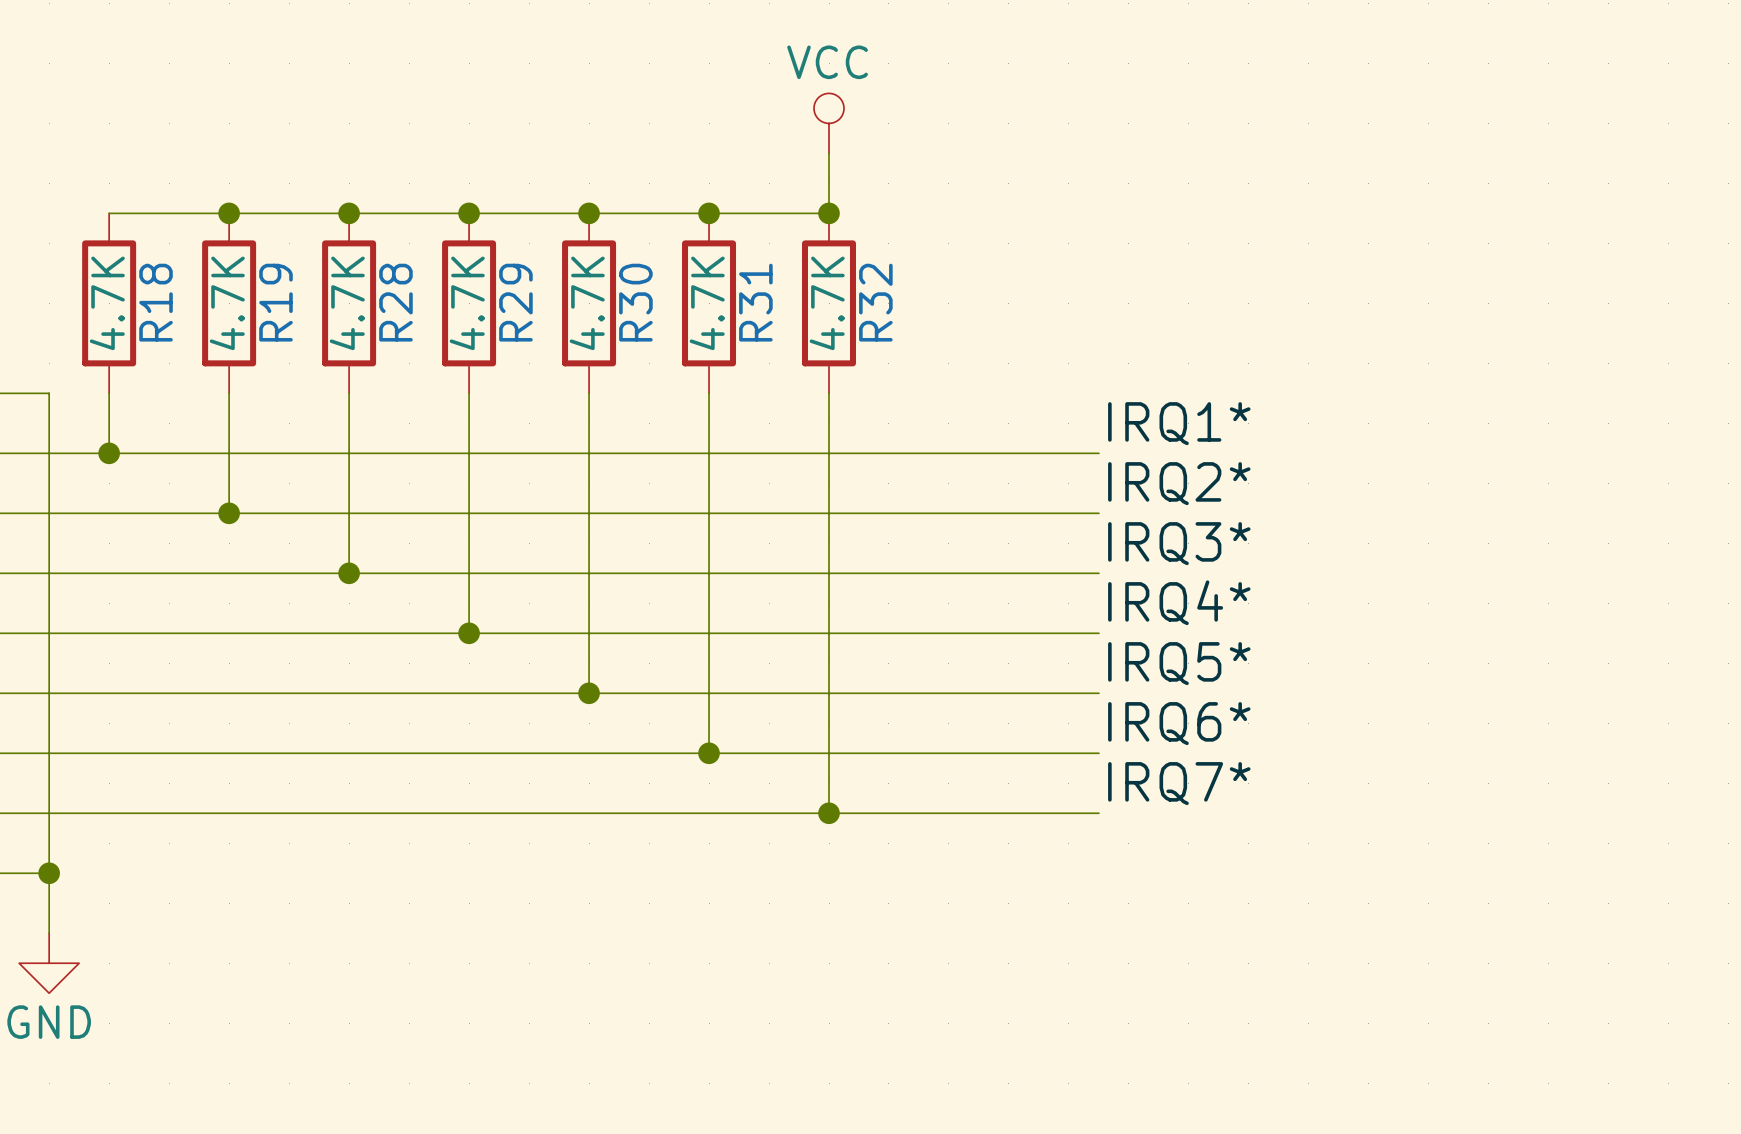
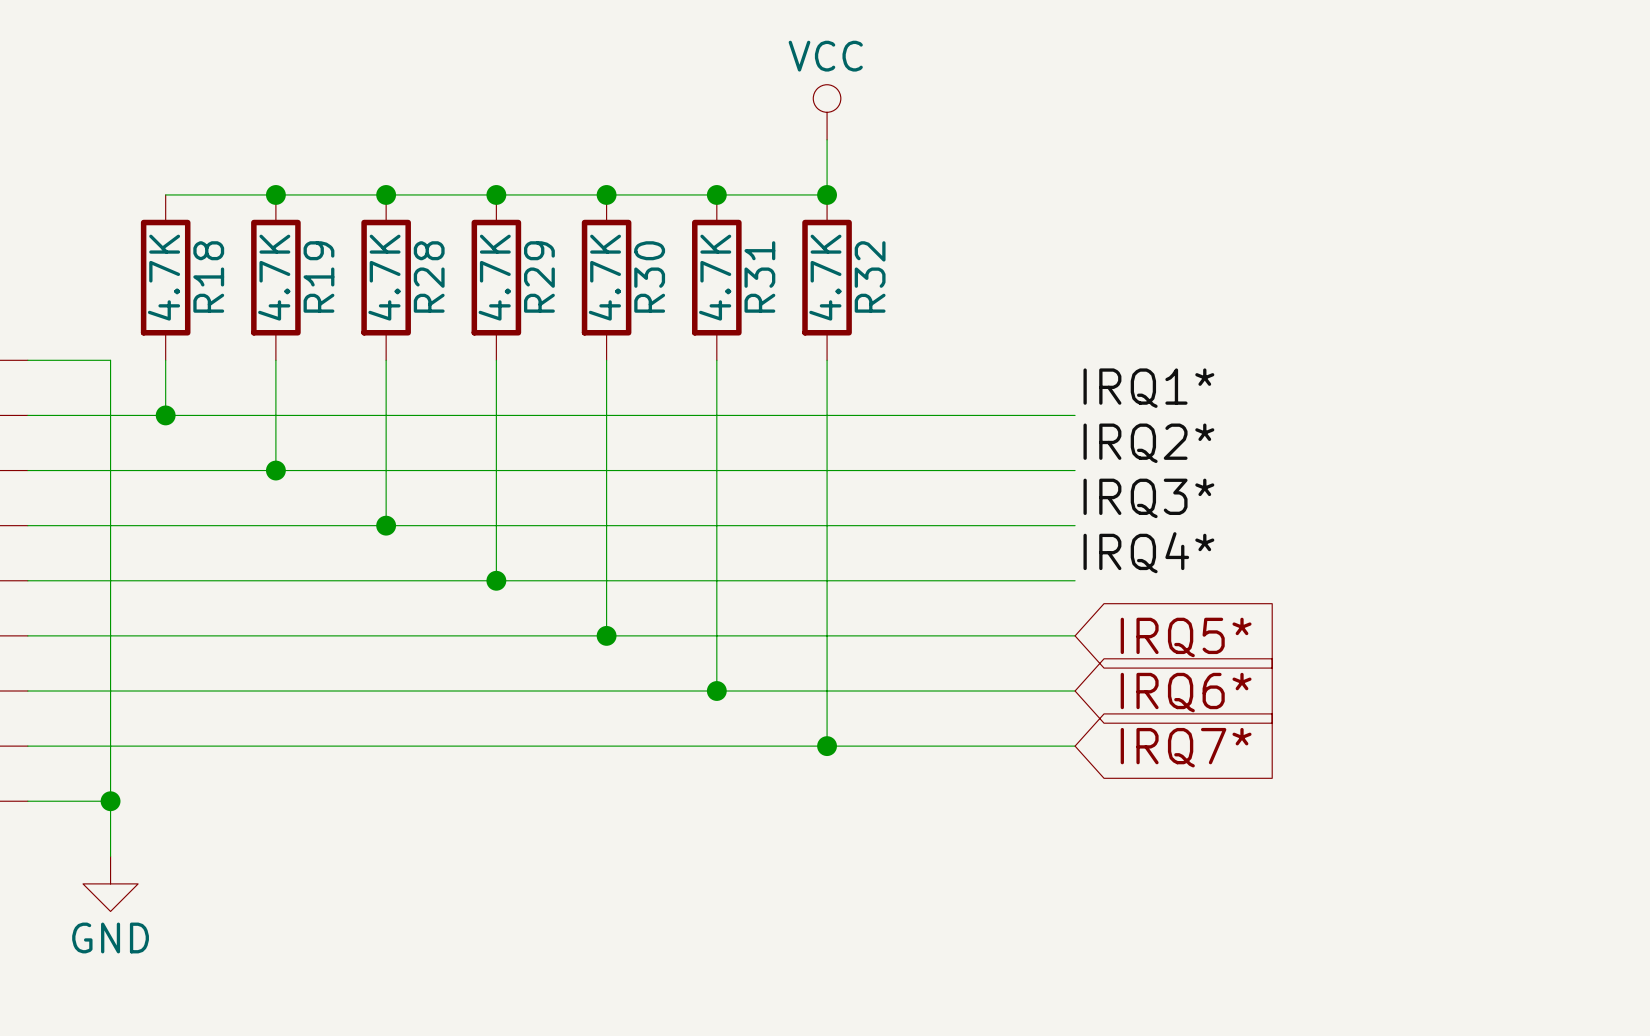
label: IRQ5* (1179, 663) -> none
global label: none -> IRQ5* (1186, 637)
label: IRQ6* (1179, 723) -> none
global label: none -> IRQ6* (1186, 692)
label: IRQ7* (1179, 783) -> none
global label: none -> IRQ7* (1186, 747)

